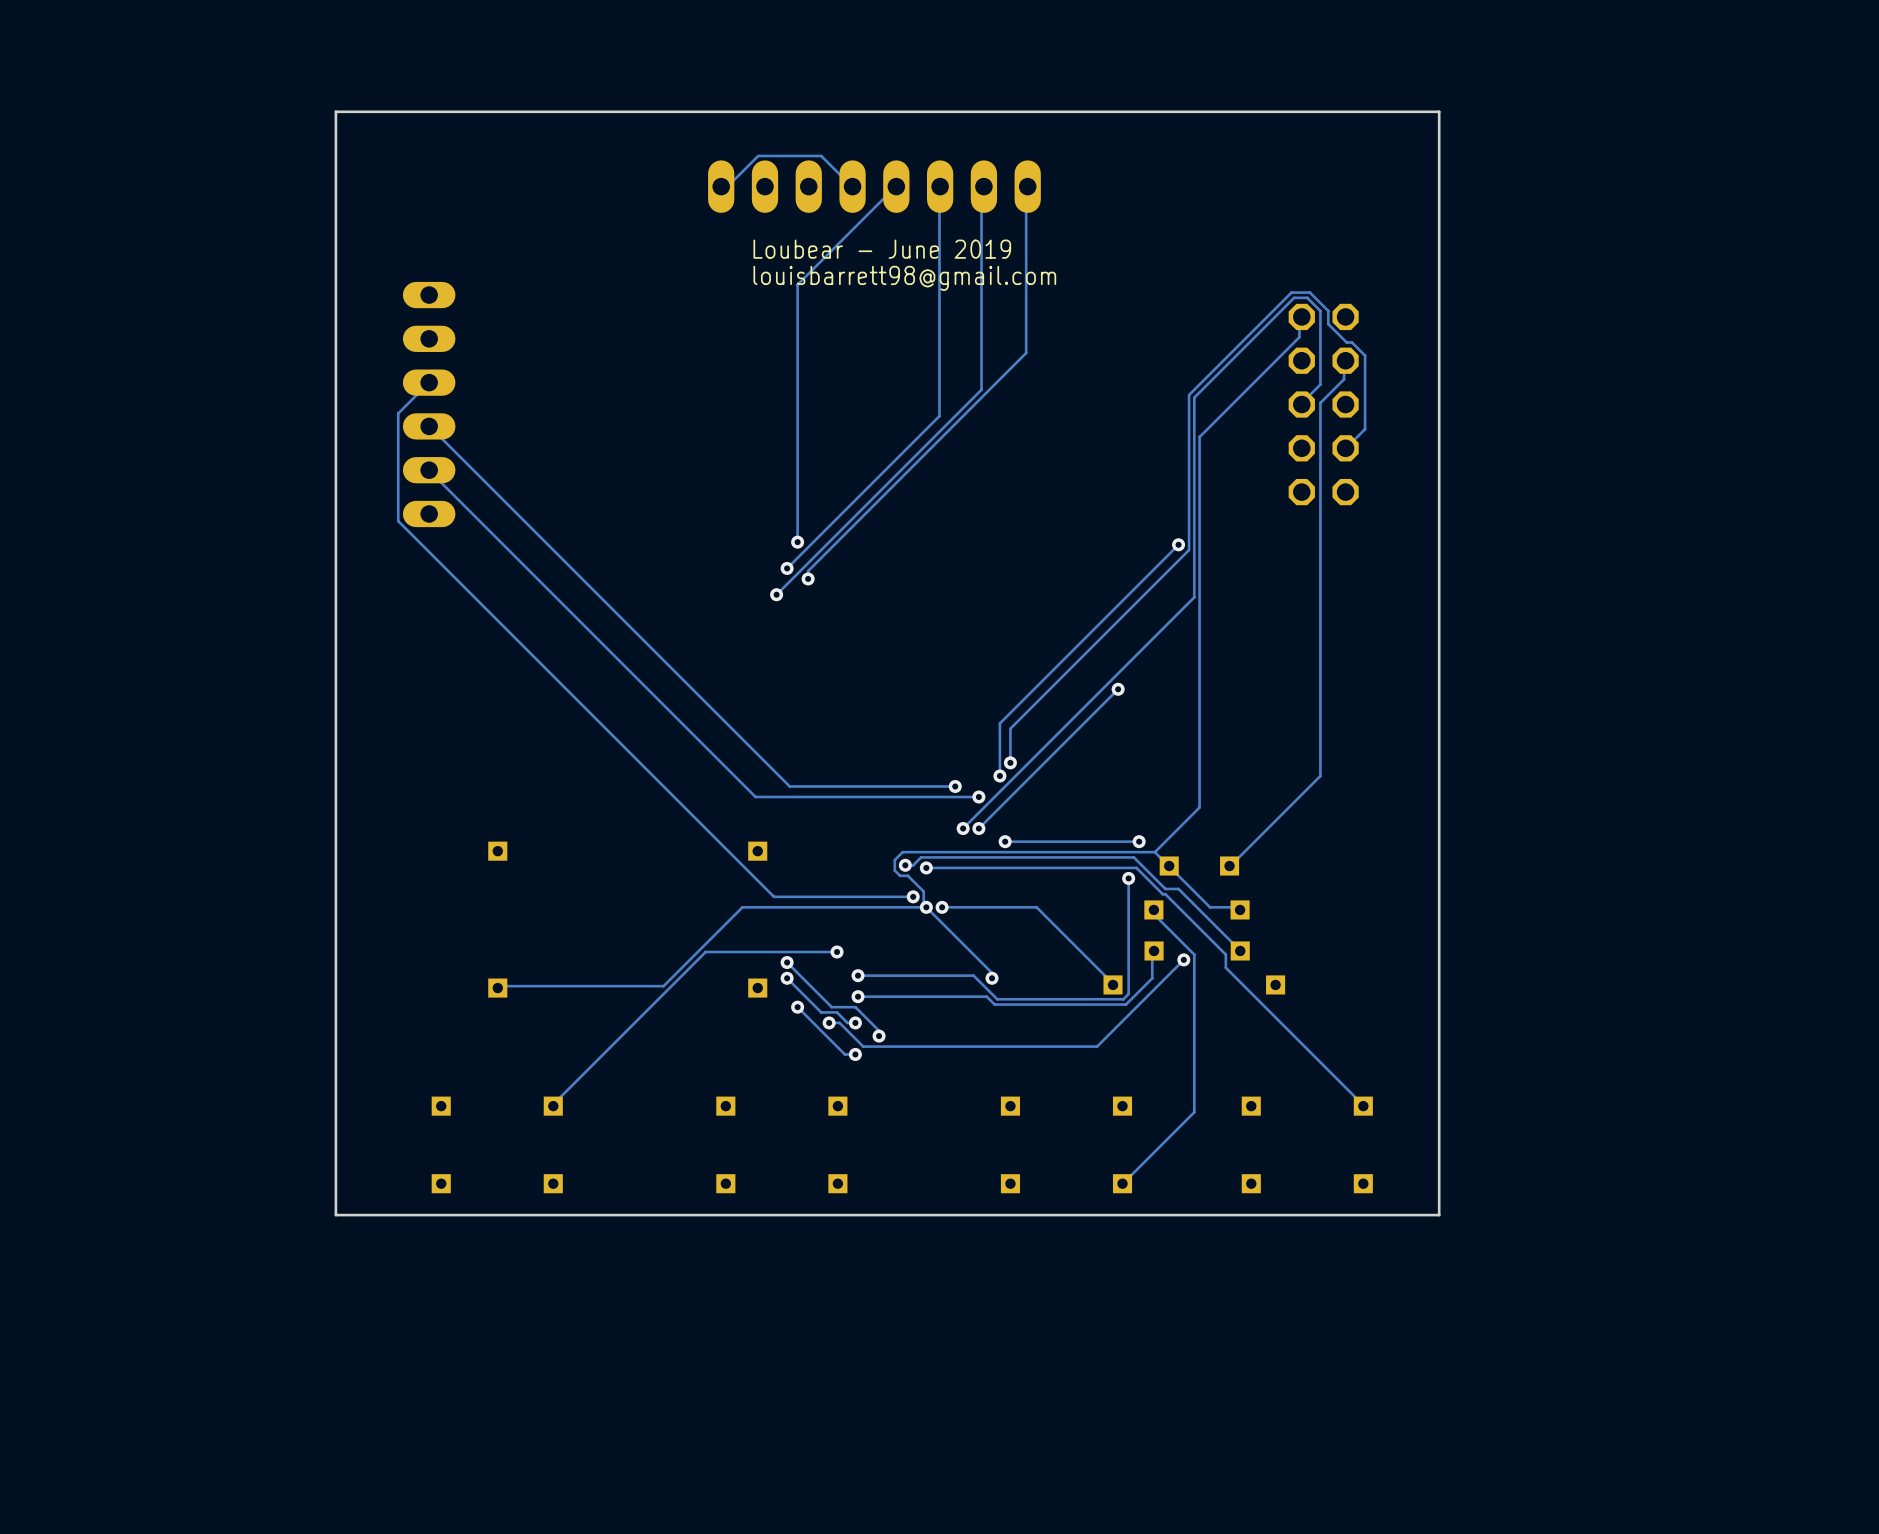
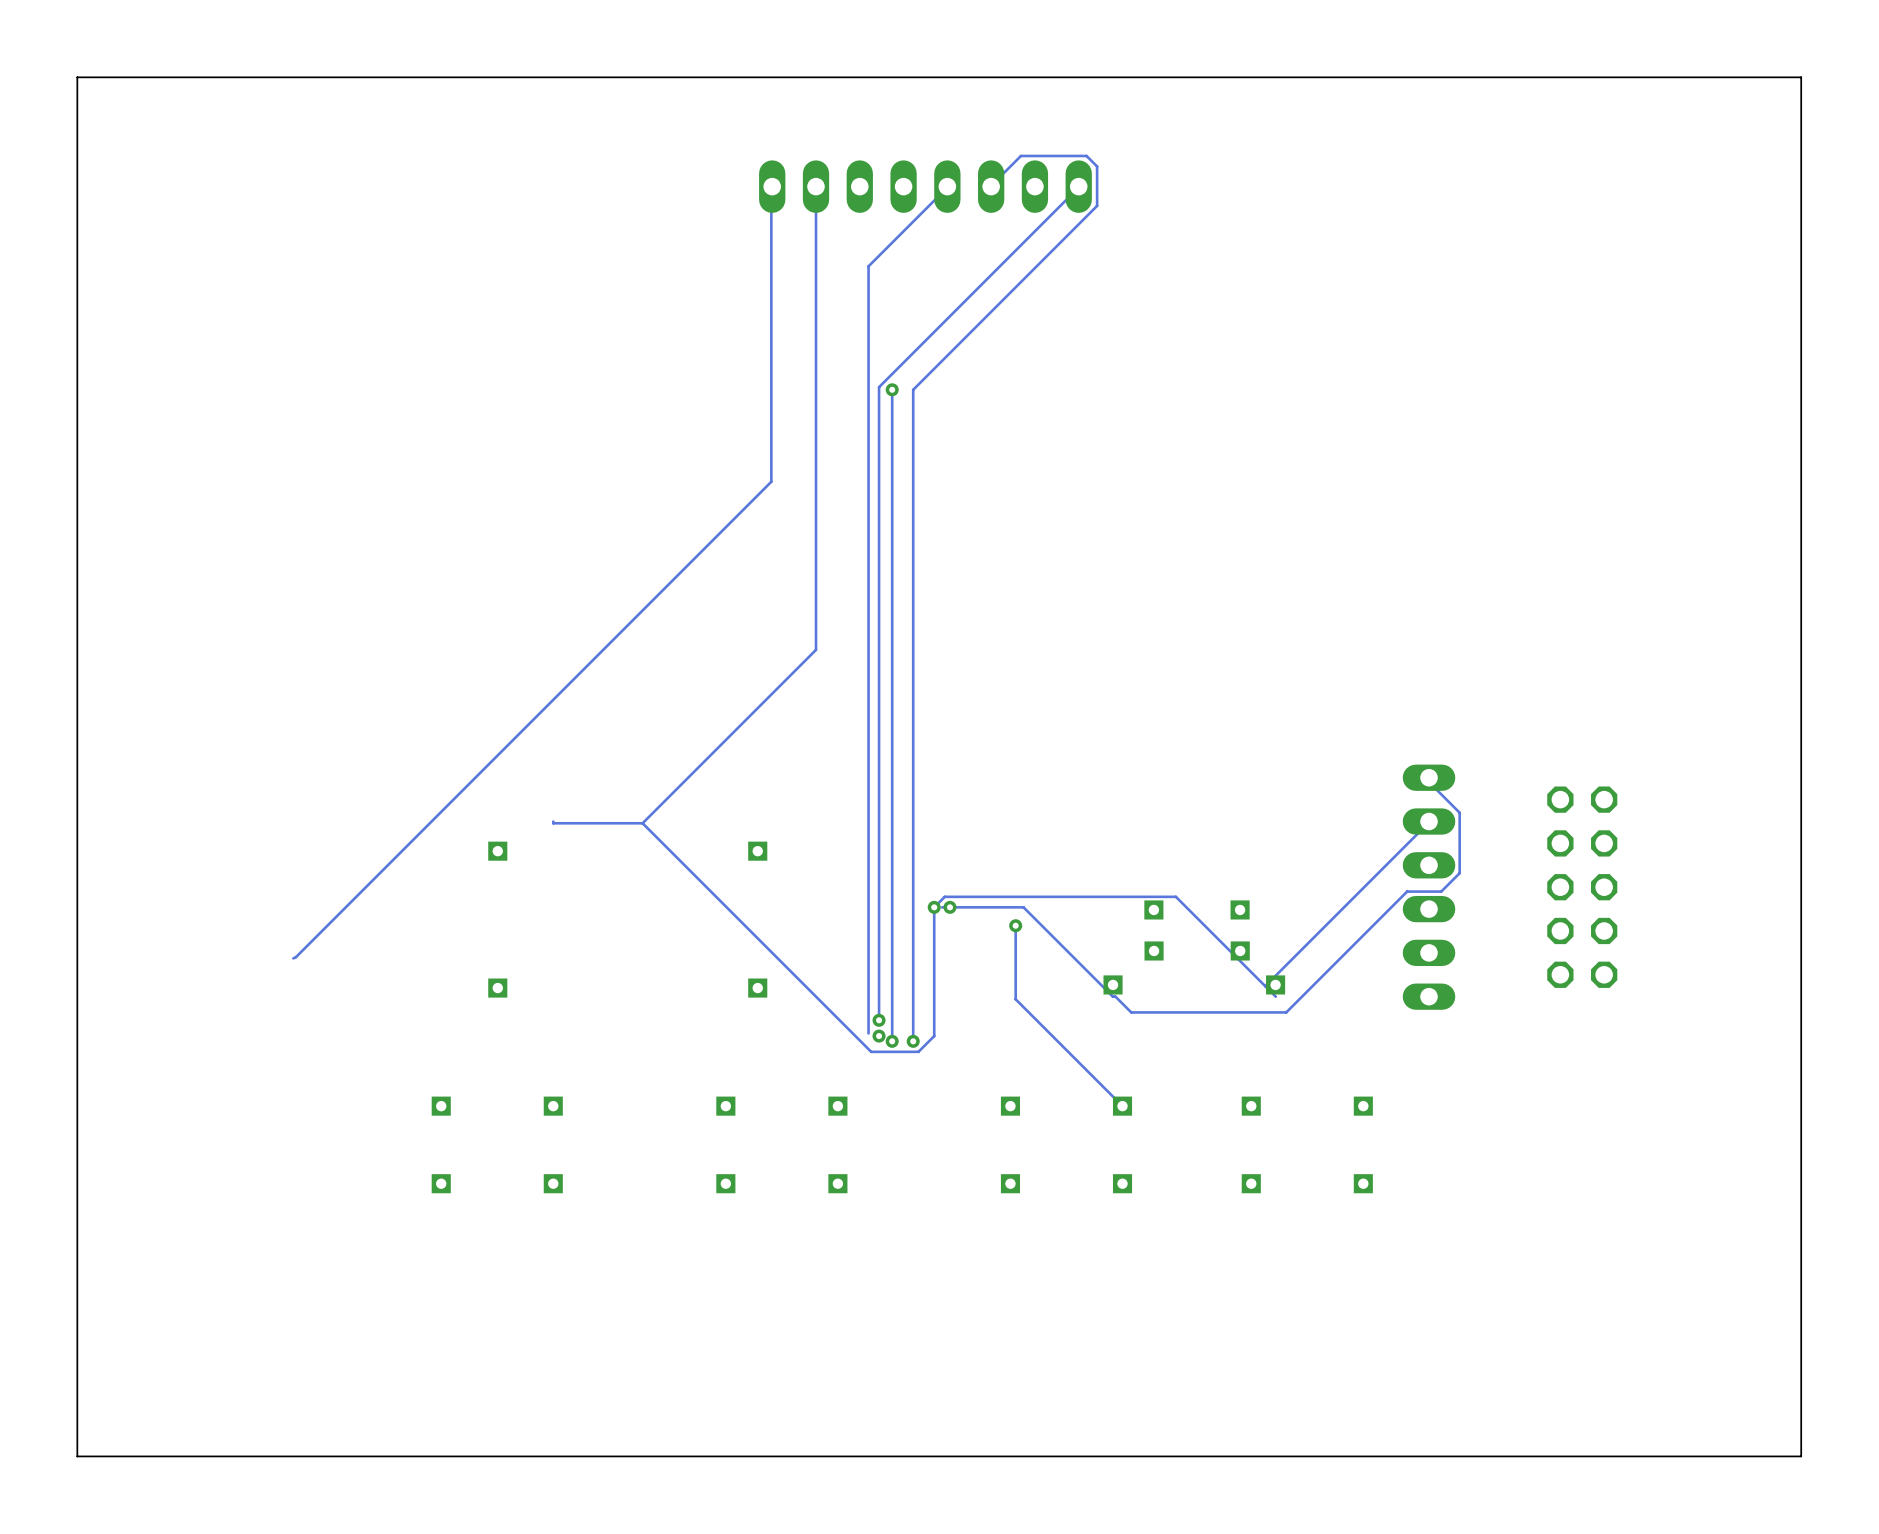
board edge: (1439, 111) (1439, 1215) (335, 1215) (335, 111) (1439, 111) -> (1801, 77) (1801, 1456) (77, 1456) (77, 77) (1801, 77)
track: none -> (772, 186) (771, 481) (293, 958)
track: none -> (816, 186) (816, 649) (642, 823)
track: (852, 186) (821, 155) (758, 155) (729, 184) (721, 184) (721, 186) -> none
part position: (874, 186) -> (925, 186)
track: (896, 186) (797, 284) (797, 542) -> none
track: (940, 186) (939, 416) (787, 568) -> none
track: none -> (947, 186) (868, 266) (868, 1033)
track: (983, 186) (981, 187) (981, 389) (776, 594) -> none
track: none -> (991, 186) (1020, 155) (1086, 155) (1097, 166) (1097, 205) (913, 389) (913, 1041)
track: (1027, 186) (1026, 187) (1026, 353) (808, 571) (808, 578) -> none
track: none -> (1078, 186) (879, 387) (879, 1020)
text: Loubear - June 2019 (882, 249) -> none
text: louisbarrett98@gmail.com (904, 278) -> none
track: (1301, 316) (1299, 318) (1299, 337) (1199, 437) (1199, 807) (1154, 852) -> none
track: (1345, 360) (1344, 379) (1320, 402) (1320, 775) (1229, 866) -> none
track: (429, 382) (398, 413) (398, 521) (773, 896) (913, 896) -> none
track: none -> (892, 389) (892, 1041)
via: none -> (892, 389)
part: (429, 404) -> none
track: (1301, 404) (1320, 384) (1320, 310) (1307, 297) (1294, 297) (1194, 397) (1194, 597) (963, 828) -> none
part: (1323, 404) -> none
track: (429, 426) (789, 786) (955, 786) -> none
track: (1345, 448) (1365, 429) (1365, 355) (1351, 342) (1346, 342) (1328, 324) (1328, 310) (1309, 292) (1291, 292) (1189, 395) (1189, 550) (1010, 728) (1010, 762) -> none
track: (429, 470) (755, 797) (978, 797) -> none
via: (797, 542) -> none
track: (1178, 544) (999, 723) (999, 775) -> none
via: (1178, 544) -> none
via: (787, 568) -> none
via: (808, 578) -> none
via: (776, 594) -> none
track: (1118, 689) (978, 828) -> none
via: (1118, 689) -> none
via: (1010, 762) -> none
via: (999, 775) -> none
via: (955, 786) -> none
via: (978, 797) -> none
track: none -> (553, 821) (553, 823) (642, 823)
track: none -> (1429, 821) (1265, 986)
track: none -> (642, 823) (871, 1051) (918, 1051) (934, 1036) (934, 907) (944, 896) (1175, 896) (1275, 996)
via: (963, 828) -> none
via: (978, 828) -> none
via: (1005, 841) -> none
track: (1139, 841) (1005, 841) -> none
via: (1139, 841) -> none
track: (1154, 852) (902, 852) (894, 860) (894, 870) (900, 875) (907, 875) (923, 891) (923, 904) (992, 973) (992, 978) -> none
track: (1154, 852) (1210, 907) (1238, 907) (1240, 909) -> none
track: (905, 865) (913, 865) (921, 857) (1133, 857) (1165, 888) (1178, 888) (1240, 950) -> none
via: (905, 865) -> none
part: (1199, 866) -> none
track: (926, 867) (1136, 867) (1225, 954) (1225, 967) (1363, 1106) -> none
via: (926, 867) -> none
track: (1128, 878) (1128, 994) (1123, 999) (997, 999) (973, 975) (858, 975) -> none
via: (1128, 878) -> none
part: none -> (1429, 887)
part: none -> (1582, 887)
via: (913, 896) -> none
track: (926, 907) (742, 907) (663, 986) (498, 986) (497, 988) -> none
via: (926, 907) -> none
via: none -> (934, 907)
via: (942, 907) -> none
via: none -> (949, 907)
track: (1023, 907) (1036, 907) (1113, 984) -> (1023, 907) (1112, 996) (1115, 996) (1131, 1012) (1286, 1012) (1407, 891) (1441, 891) (1459, 873) (1459, 812) (1430, 783) (1429, 777)
track: (1153, 909) (1154, 915) (1194, 954) (1194, 1112) (1122, 1183) -> none
track: none -> (1015, 925) (1015, 999) (1122, 1106)
via: none -> (1015, 925)
track: (1154, 950) (1152, 952) (1152, 978) (1126, 1004) (994, 1004) (986, 996) (858, 996) -> none
track: (837, 952) (705, 952) (553, 1106) -> none
via: (837, 952) -> none
track: (1183, 959) (1097, 1046) (863, 1046) (839, 1022) (829, 1022) -> none
via: (1183, 959) -> none
track: (787, 962) (831, 1007) (855, 1007) (879, 1030) (879, 1036) -> none
via: (787, 962) -> none
via: (858, 975) -> none
track: (787, 978) (821, 1012) (837, 1012) (847, 1022) (855, 1022) -> none
via: (787, 978) -> none
via: (992, 978) -> none
via: (858, 996) -> none
track: (797, 1007) (844, 1054) (855, 1054) -> none
via: (797, 1007) -> none
via: none -> (879, 1020)
via: (829, 1022) -> none
via: (855, 1022) -> none
via: none -> (892, 1041)
via: none -> (913, 1041)
via: (855, 1054) -> none

